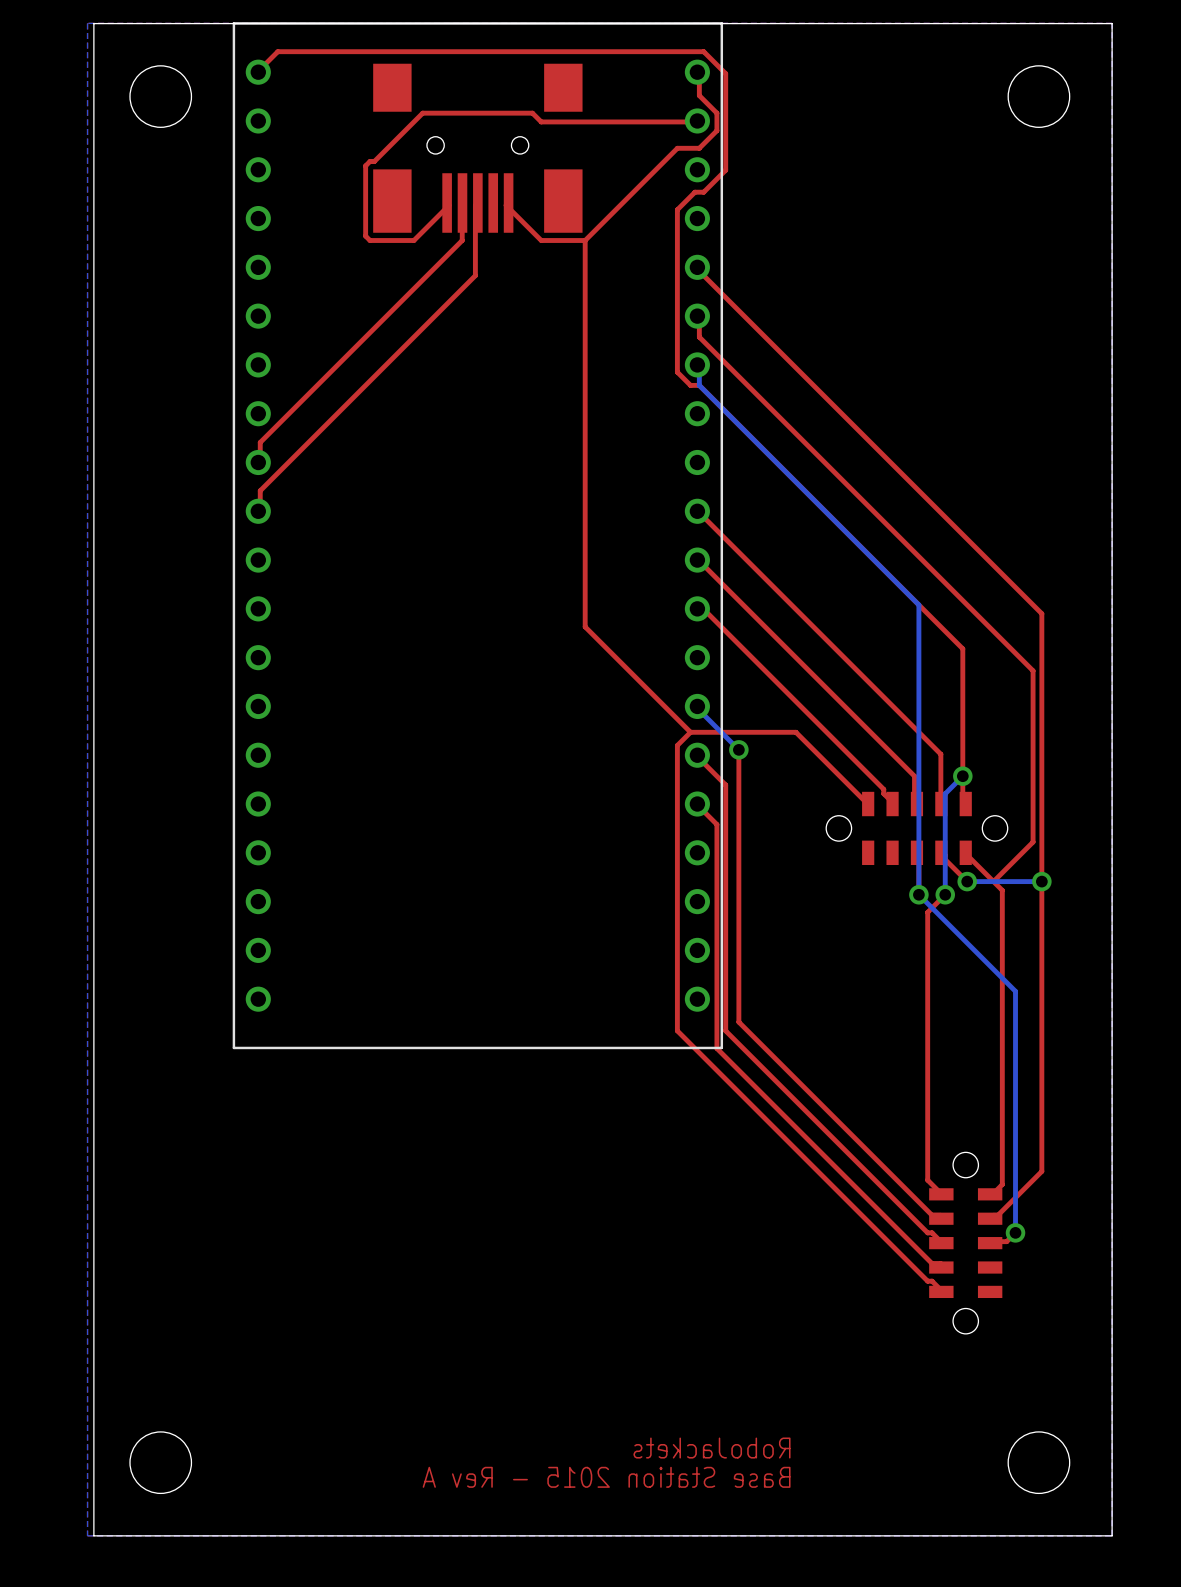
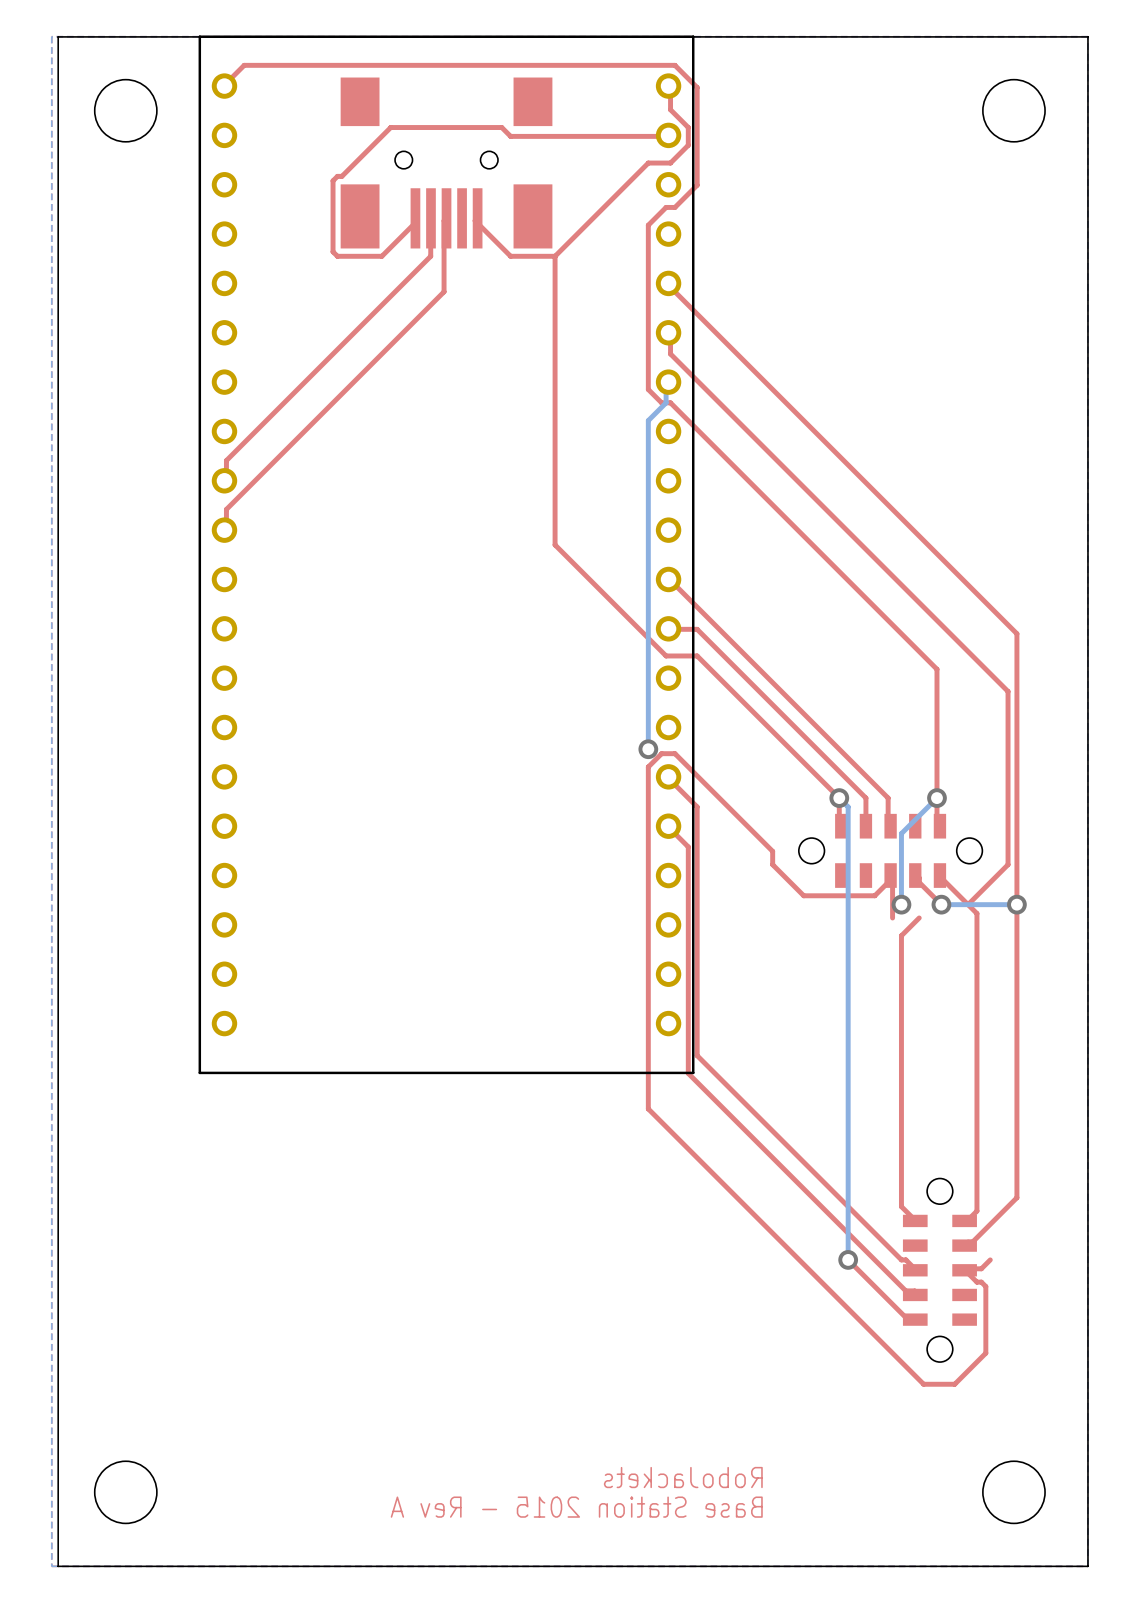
bottom track: (697, 364) (699, 367) (699, 385) (918, 604) (918, 894) (1015, 991) (1015, 1232) -> (668, 382) (666, 385) (666, 402) (648, 420) (648, 749)
top track: (697, 511) (940, 754) (941, 804) -> none
top track: (585, 525) (585, 626) (690, 732) -> (555, 544) (666, 655) (697, 655) (839, 798) (839, 824)
top track: (697, 608) (699, 604) (883, 789) (883, 793) (892, 802) -> (668, 628) (697, 629) (865, 798) (865, 824)
bottom track: (697, 706) (738, 749) -> none
via: none -> (648, 749)
top track: (703, 732) (795, 732) (866, 802) -> (674, 753) (772, 851) (772, 864) (803, 895) (874, 895) (892, 878)
top track: (738, 749) (738, 1022) (932, 1215) (940, 1215) (941, 1218) -> none
via: (738, 749) -> none
bottom track: none -> (839, 798) (848, 806) (848, 1259)
via: none -> (839, 798)
bottom track: (945, 793) (945, 894) -> (919, 815) (901, 833) (901, 904)
via: none -> (901, 904)
via: (918, 894) -> none
via: (945, 894) -> none
top track: (677, 1030) (927, 1281) (932, 1281) (940, 1289) -> (648, 1055) (648, 1108) (923, 1384) (954, 1384) (985, 1353) (985, 1286) (981, 1282) (976, 1282) (964, 1270)
top track: none -> (848, 1259) (905, 1317) (914, 1317)
via: none -> (848, 1259)
via: (1015, 1232) -> none

